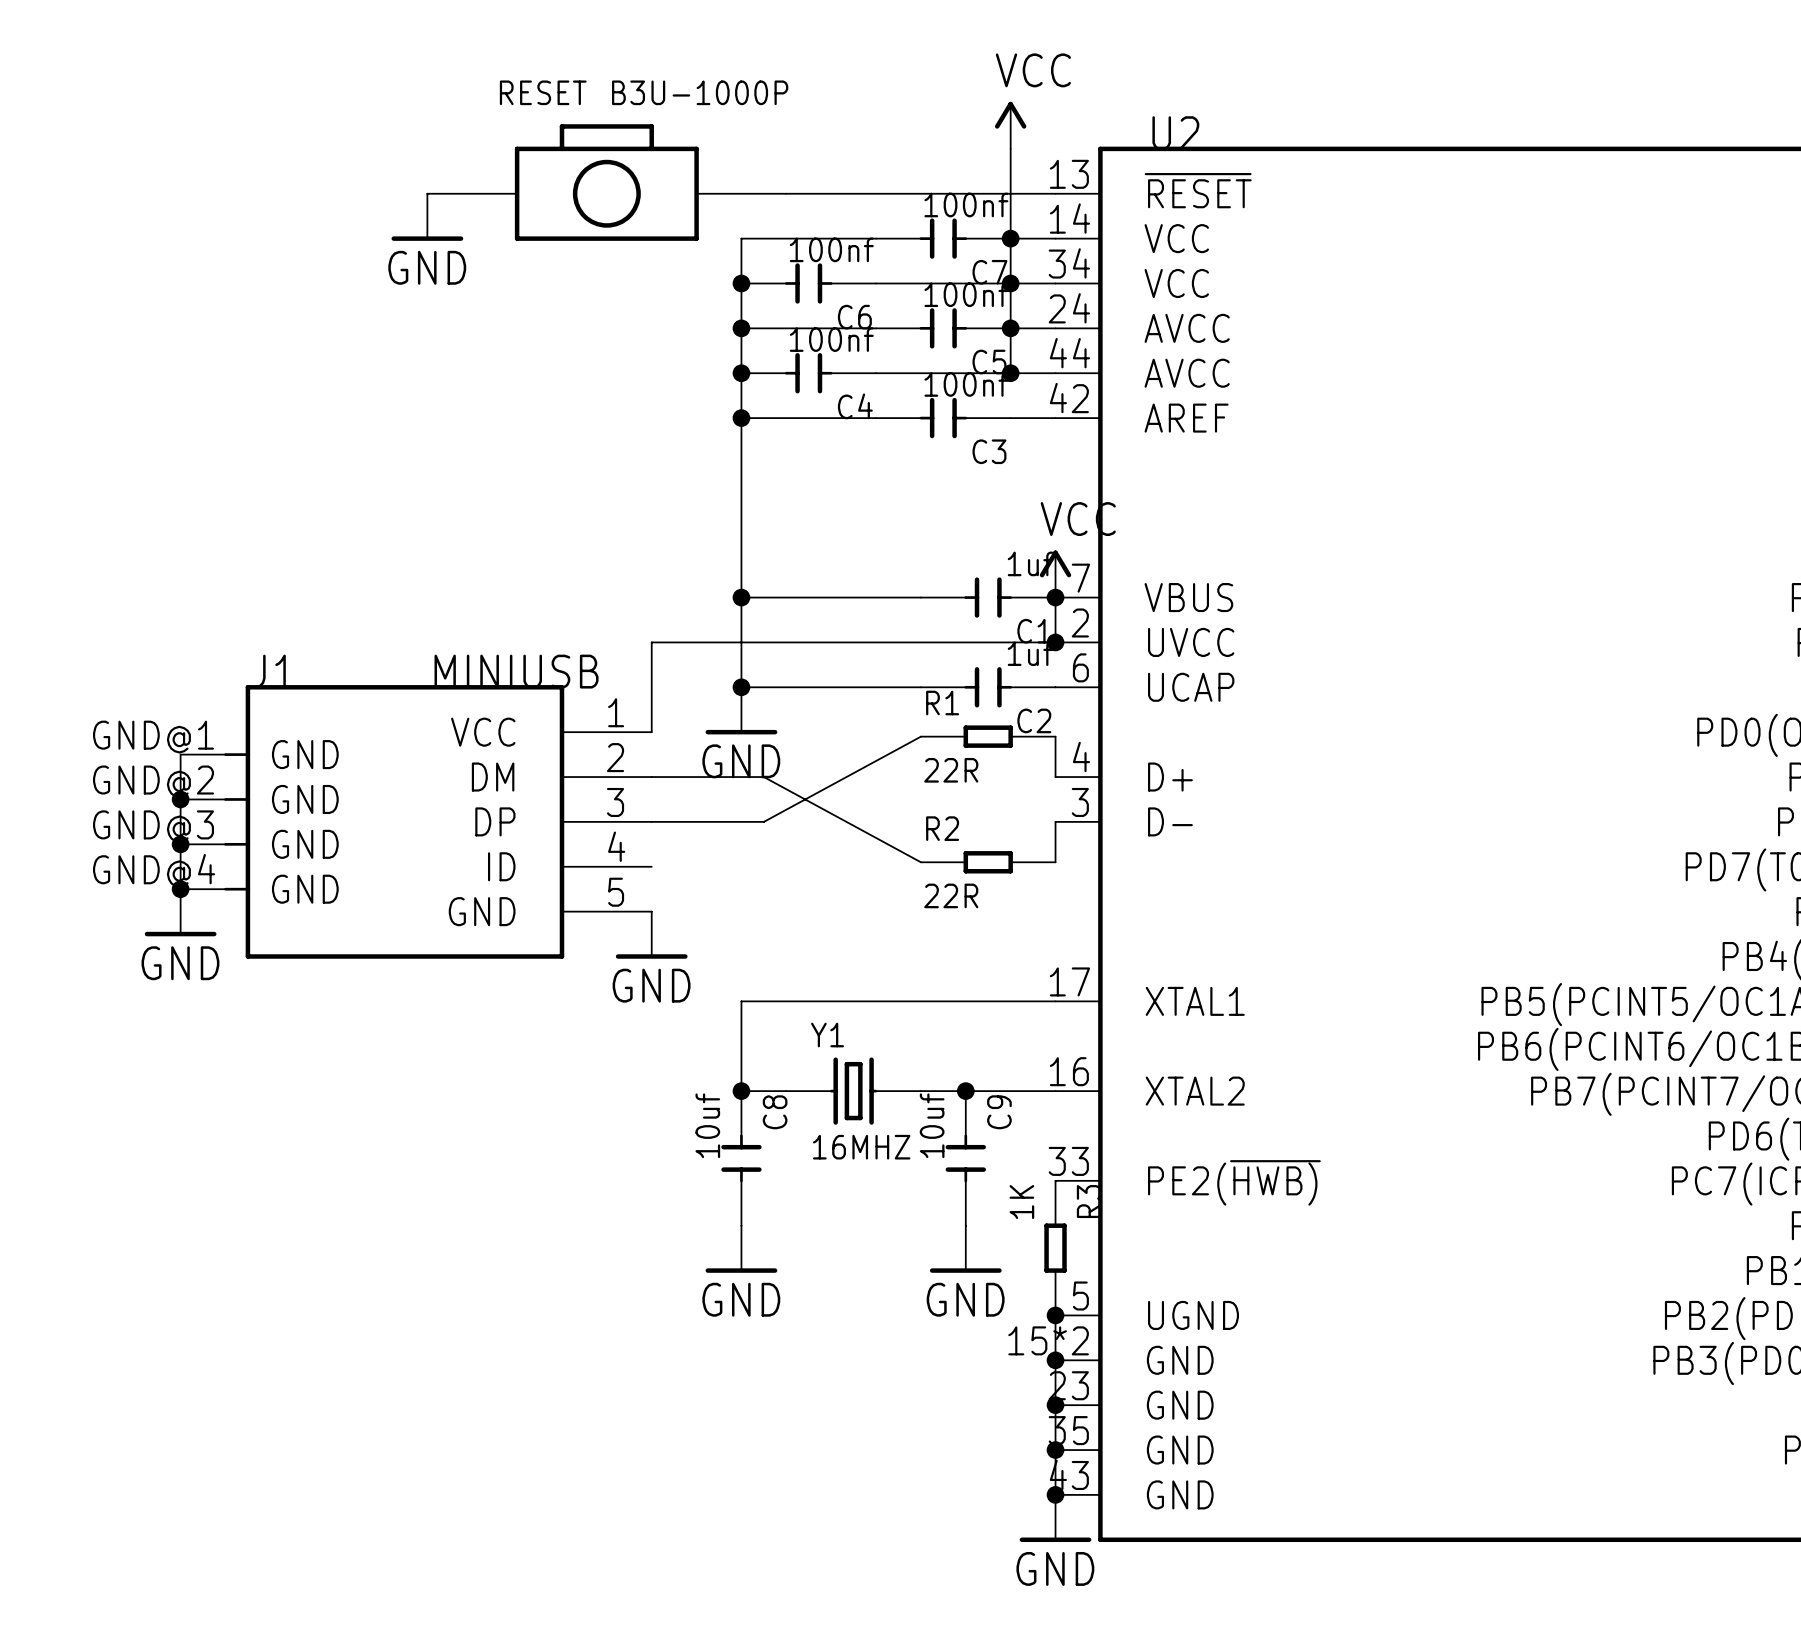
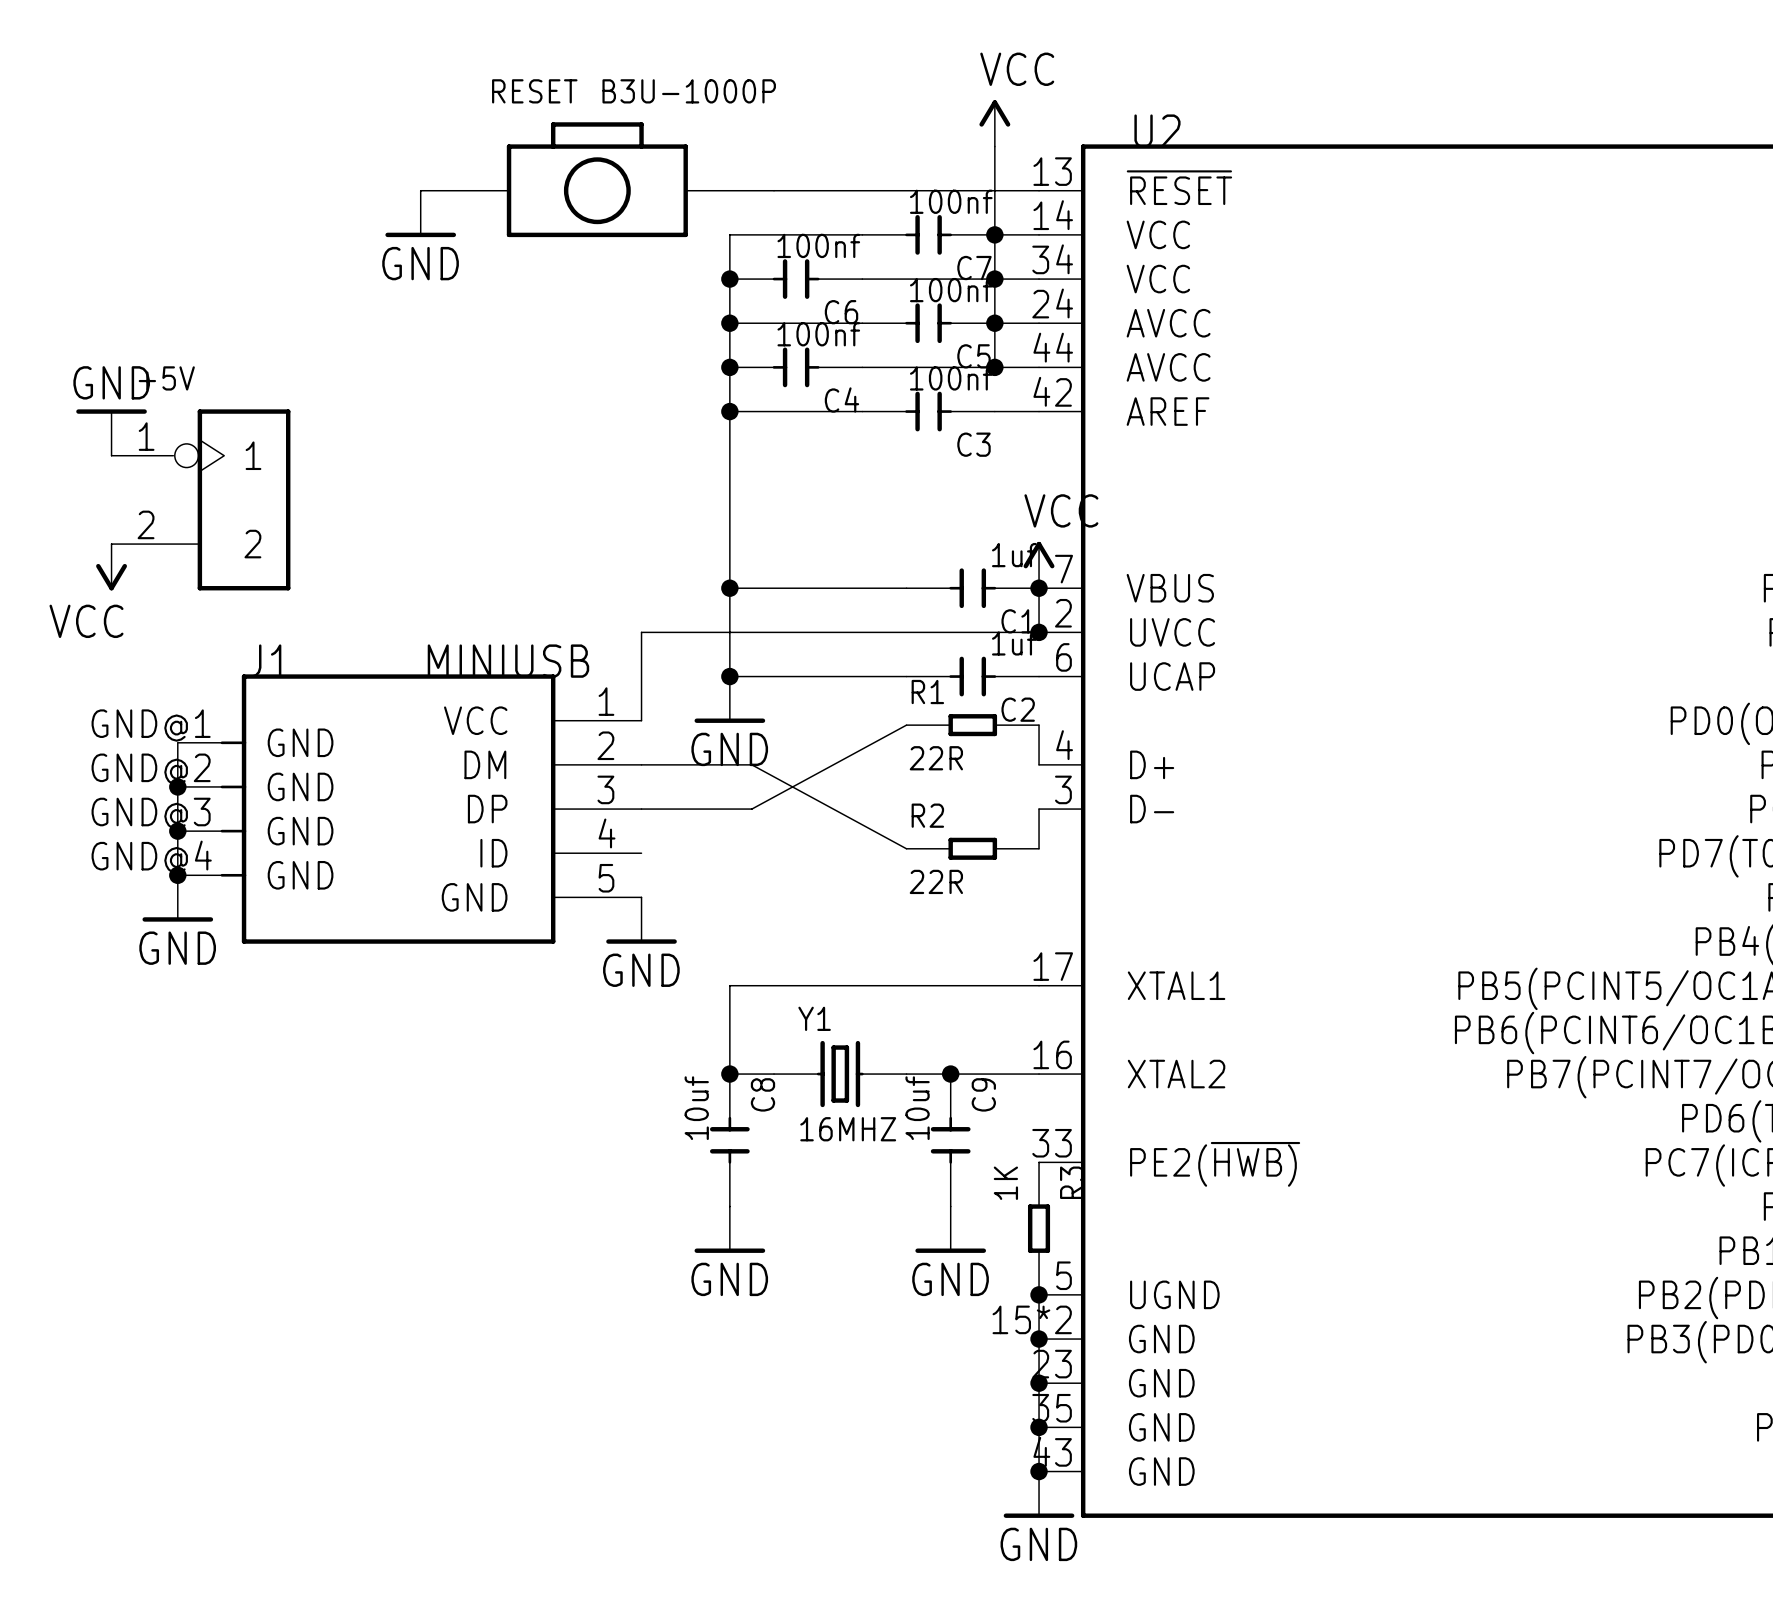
power symbol: none -> GND (111, 432)
+5V: none -> (200, 499)
power symbol: none -> VCC (111, 567)

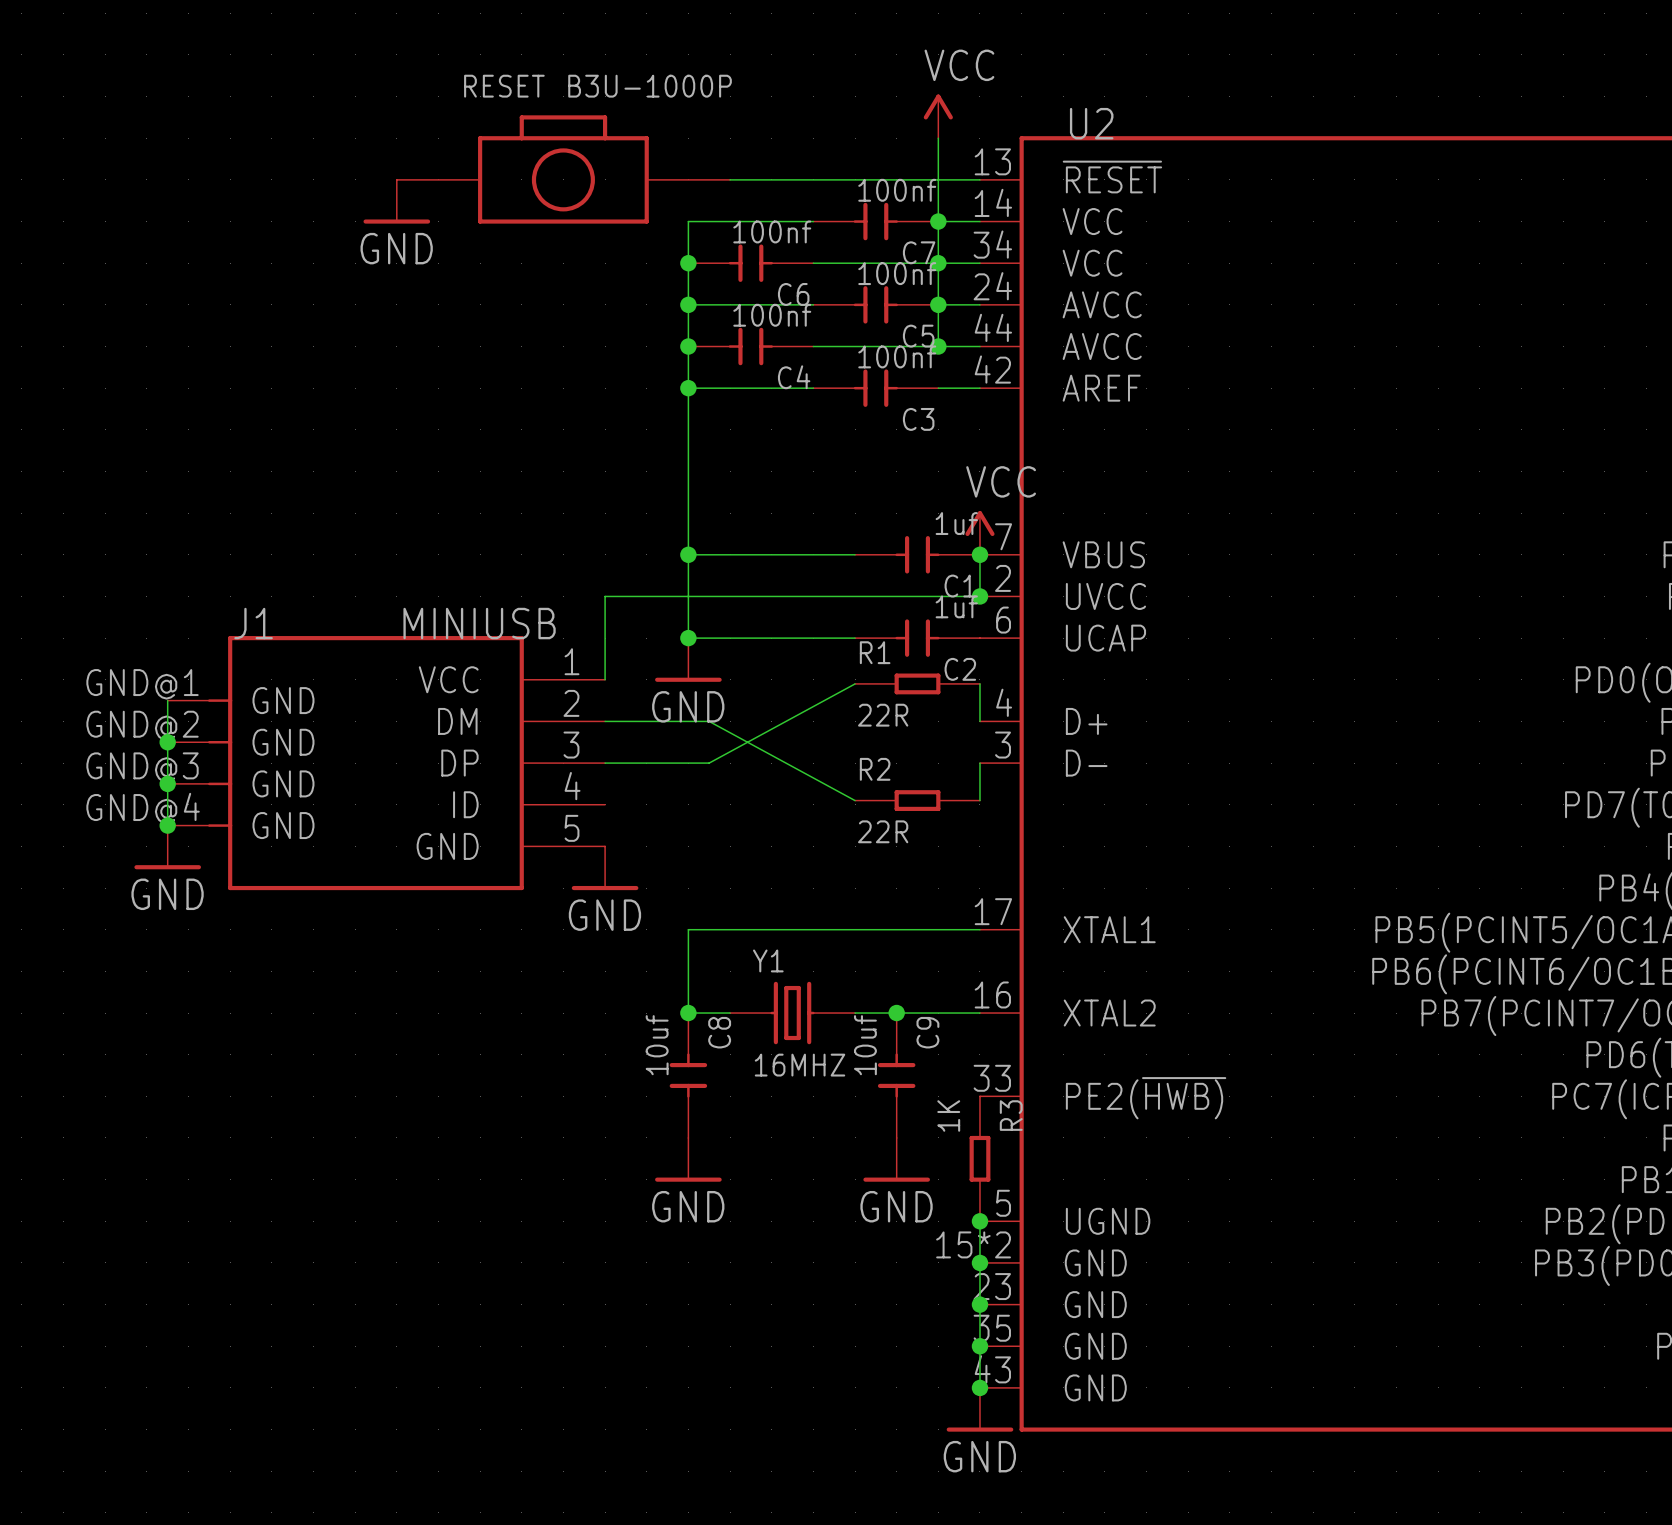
power symbol: GND (111, 432) -> none
+5V: (200, 499) -> none
power symbol: VCC (111, 567) -> none

